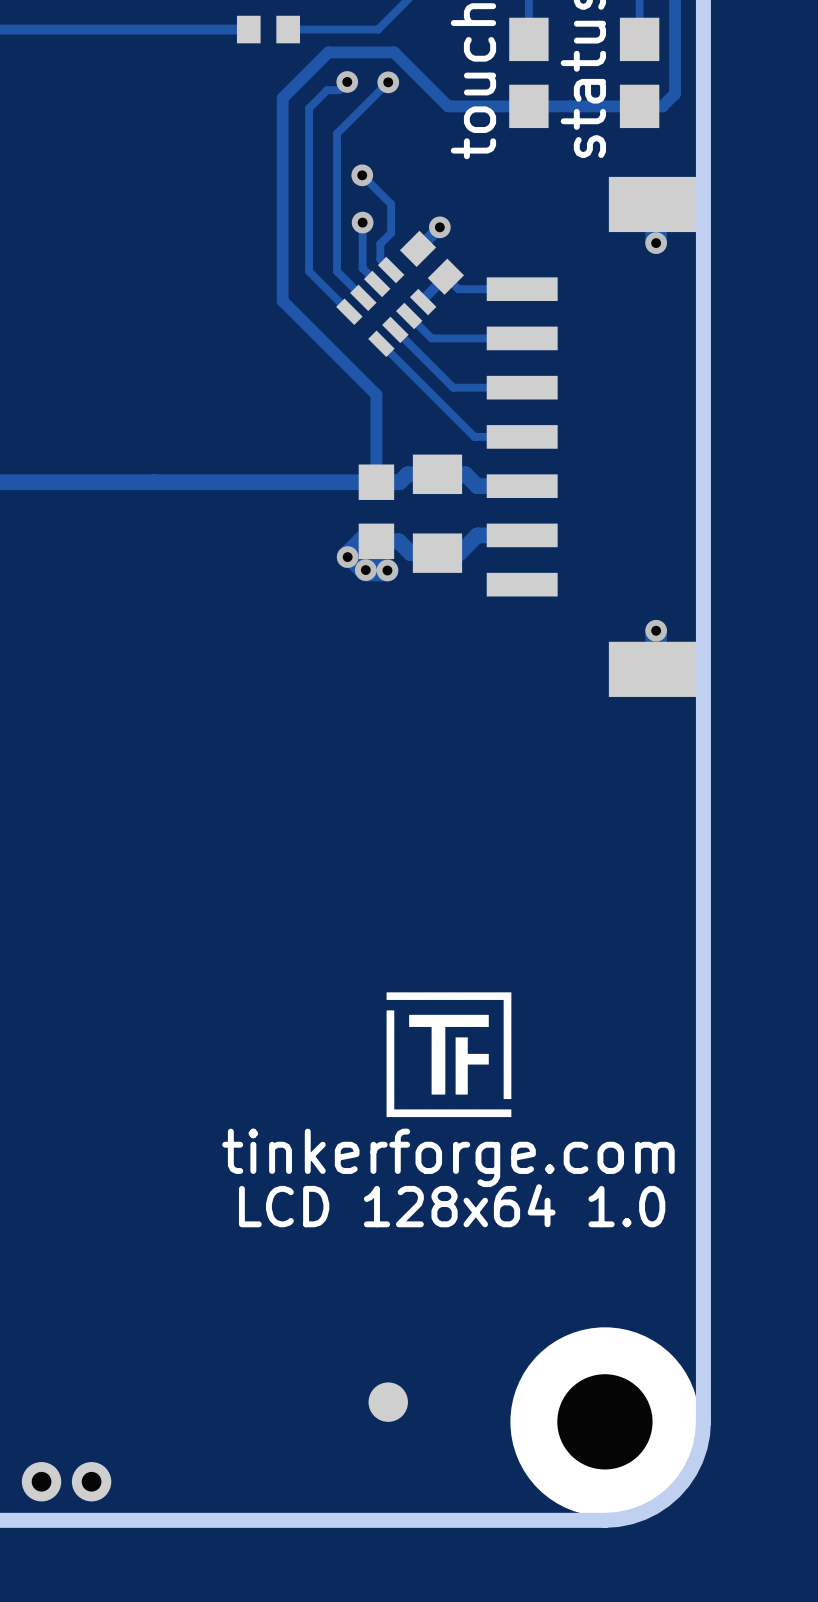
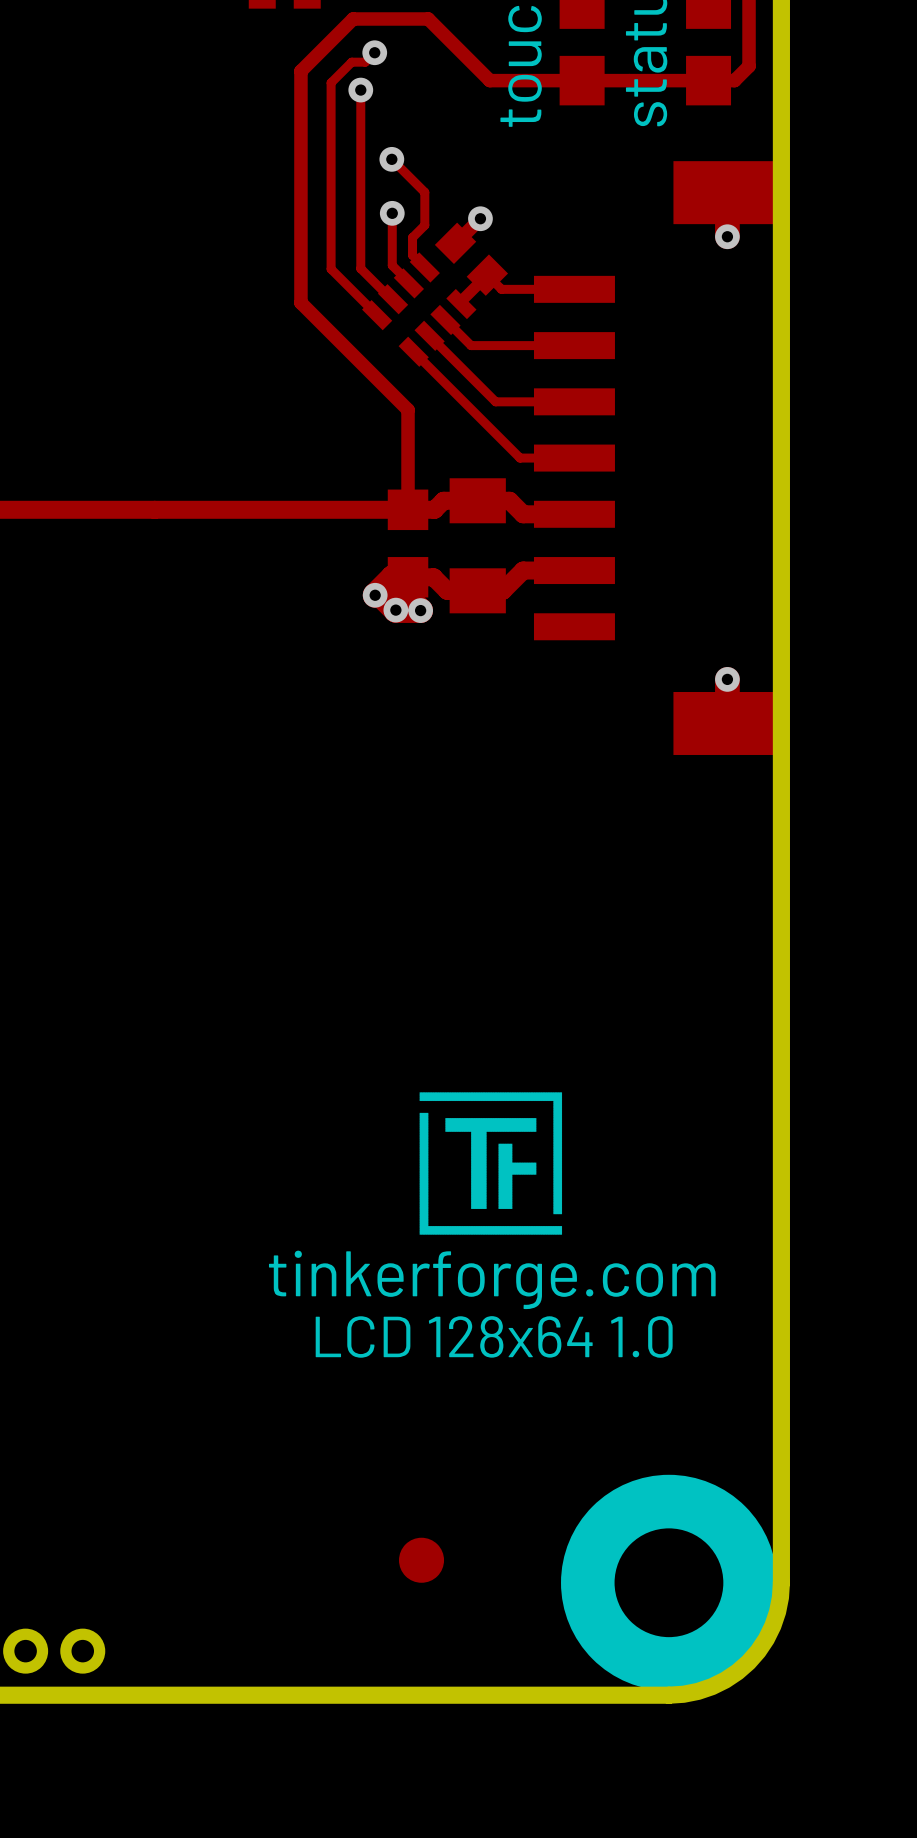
track: (388, 82) (337, 133) (337, 271) (363, 297) -> (360, 90) (360, 268) (391, 299)
via position: (388, 82) -> (360, 90)

